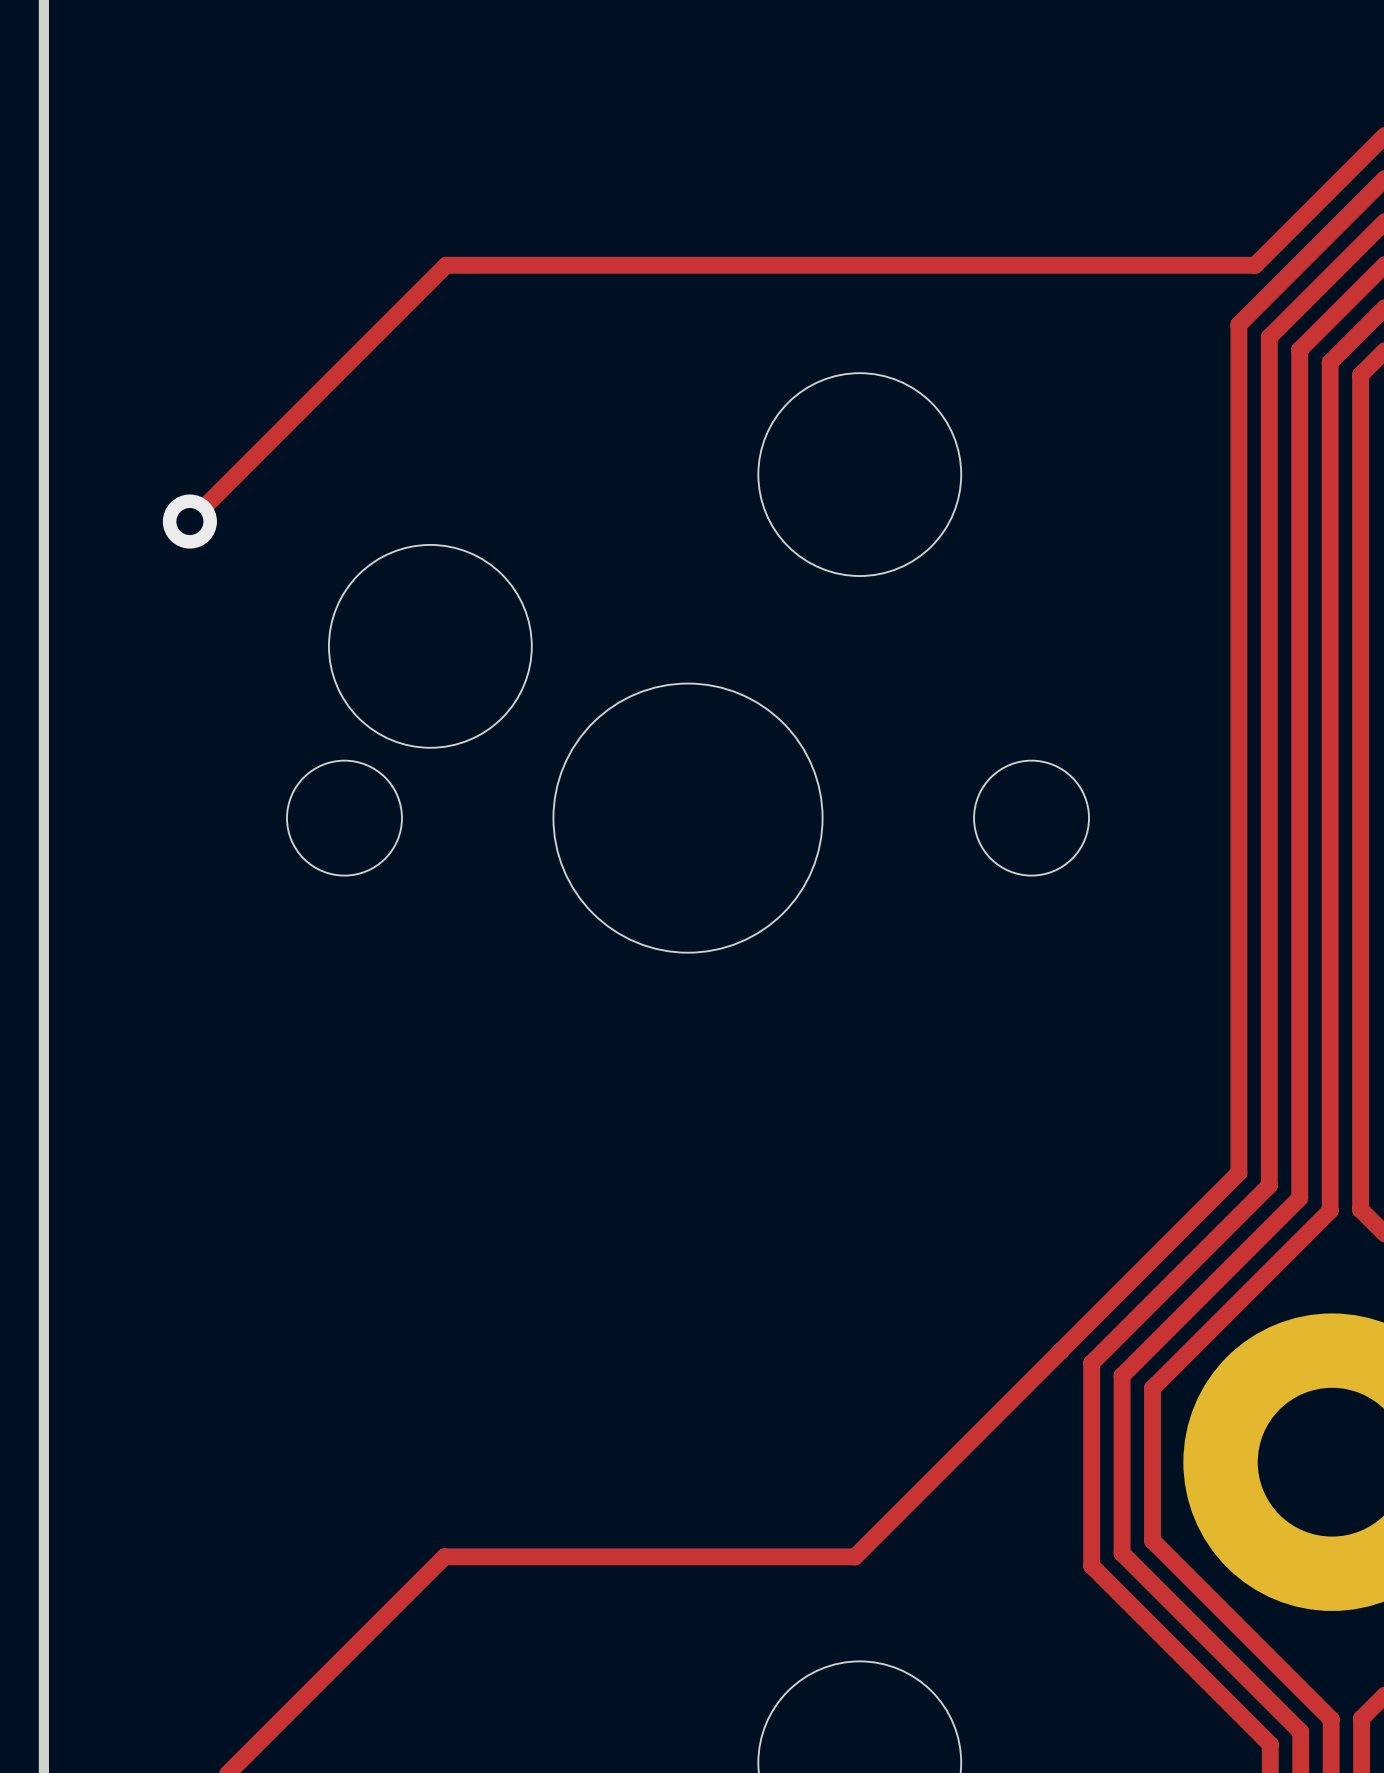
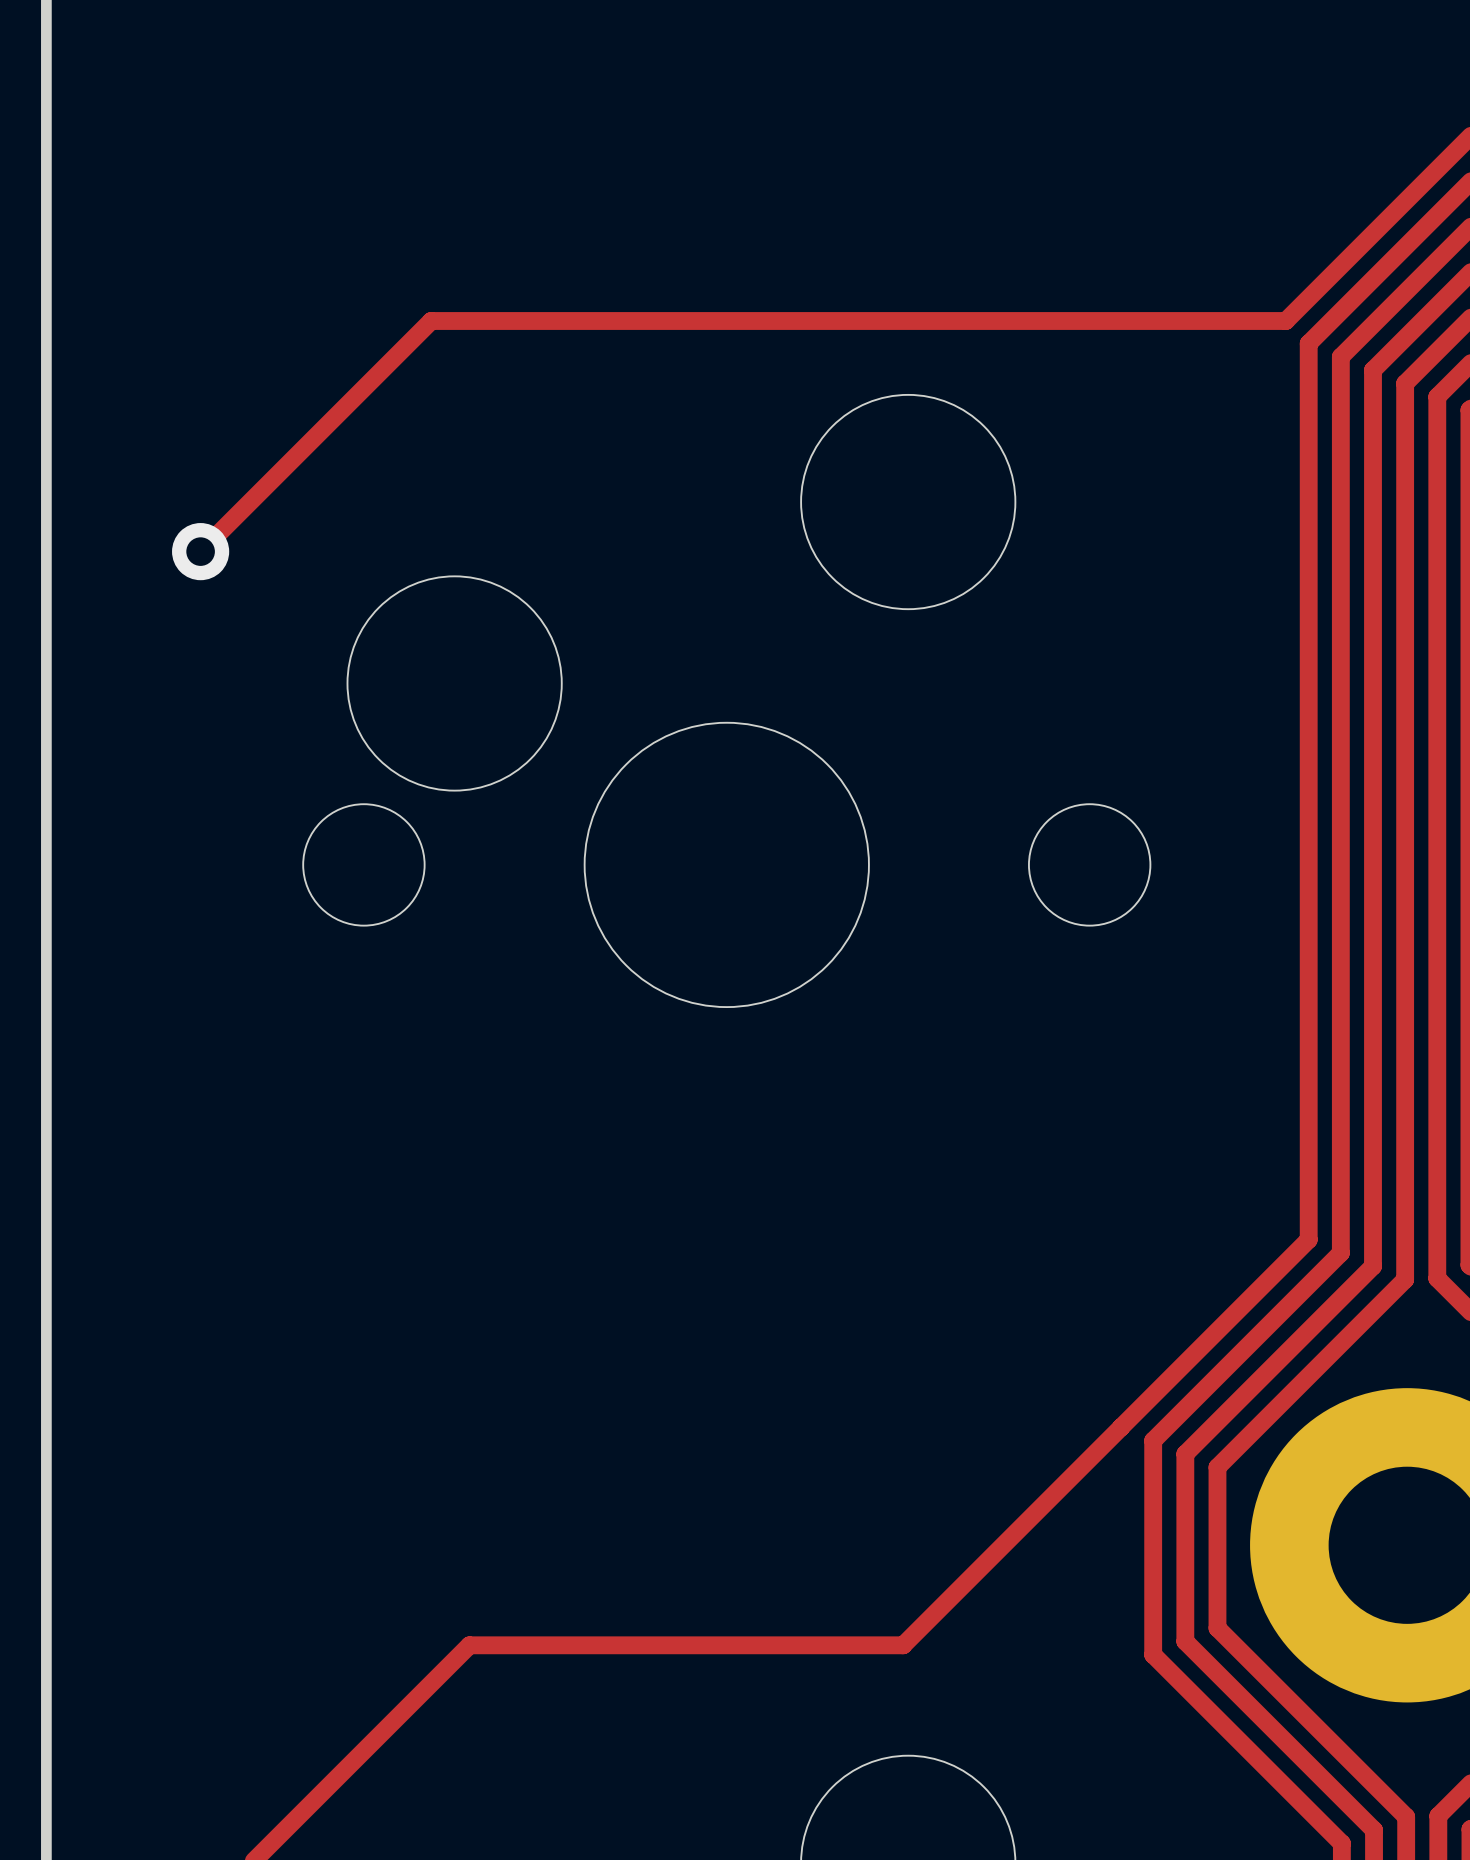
track: (1255, 265) (446, 265) (408, 303) -> (1325, 280) (1285, 321) (431, 321)

